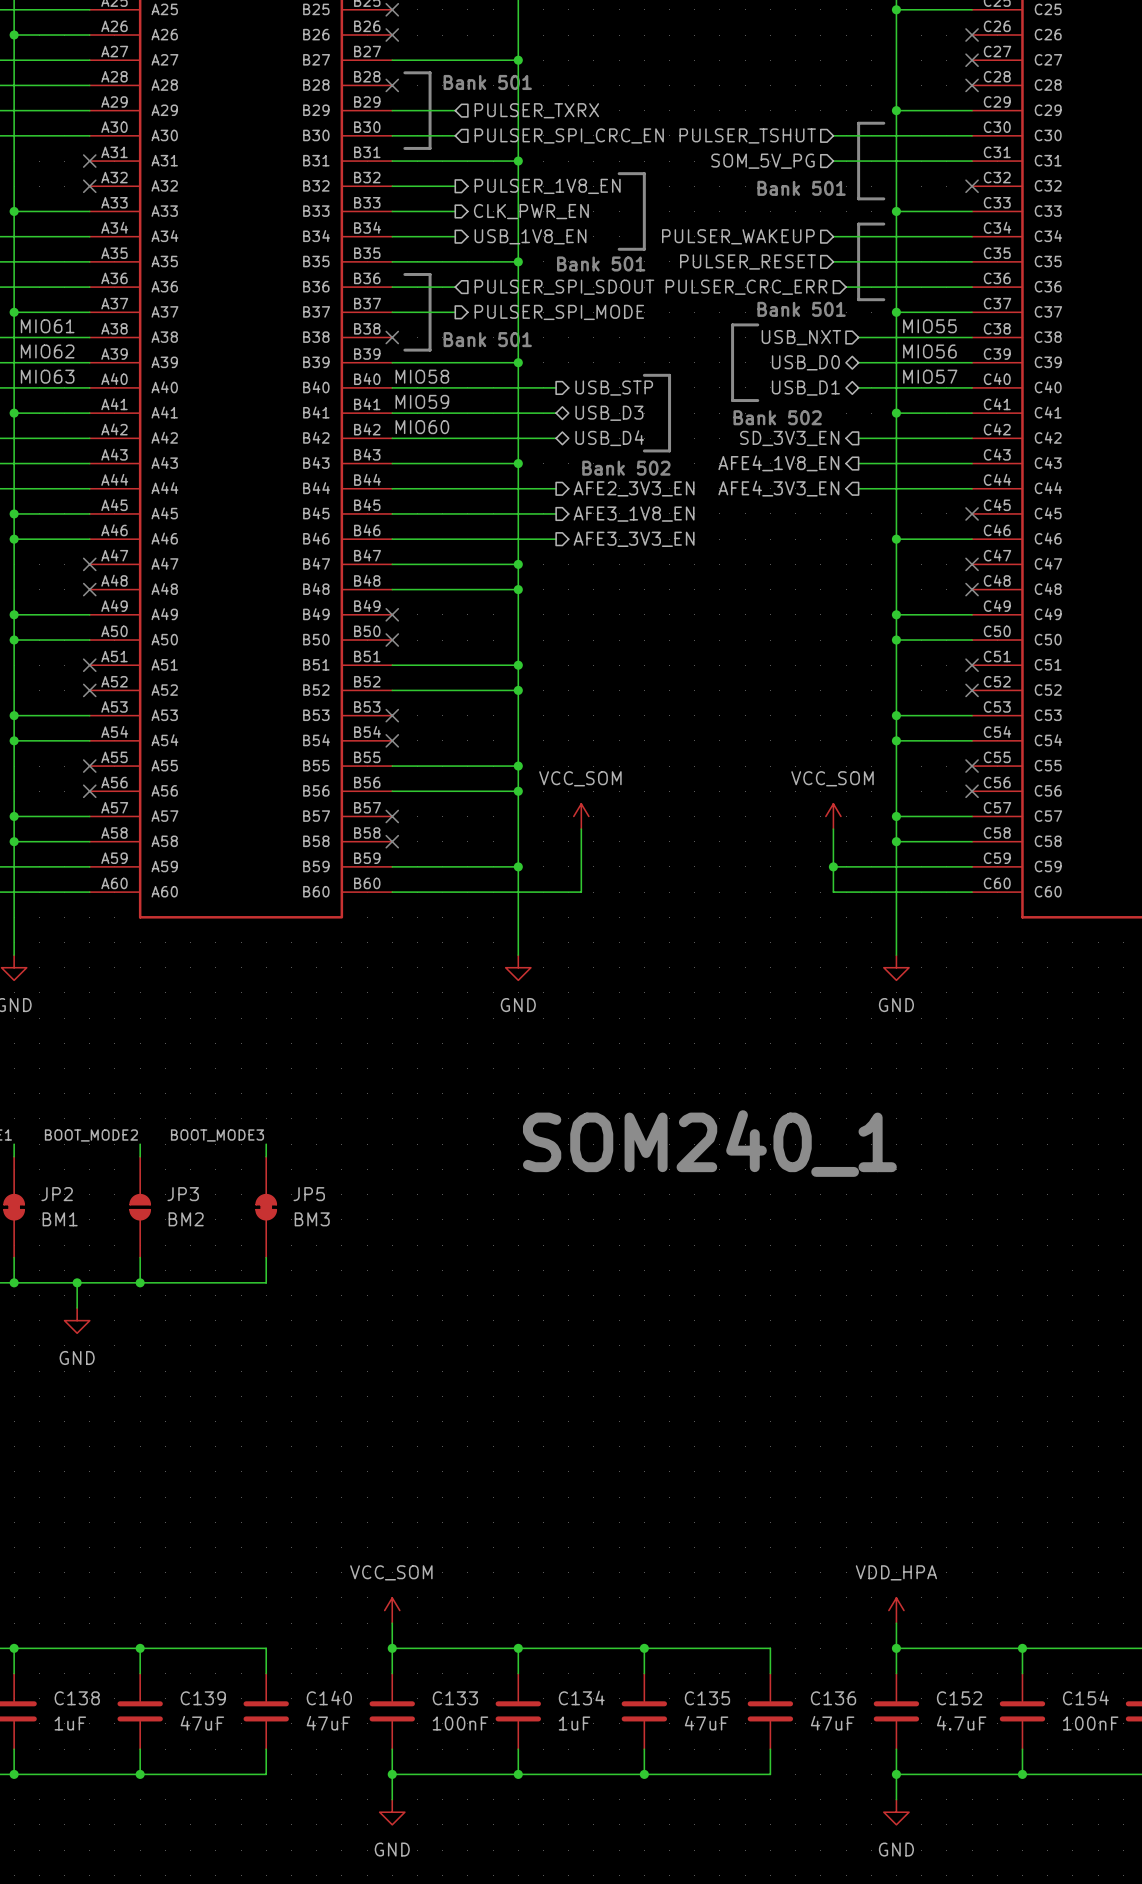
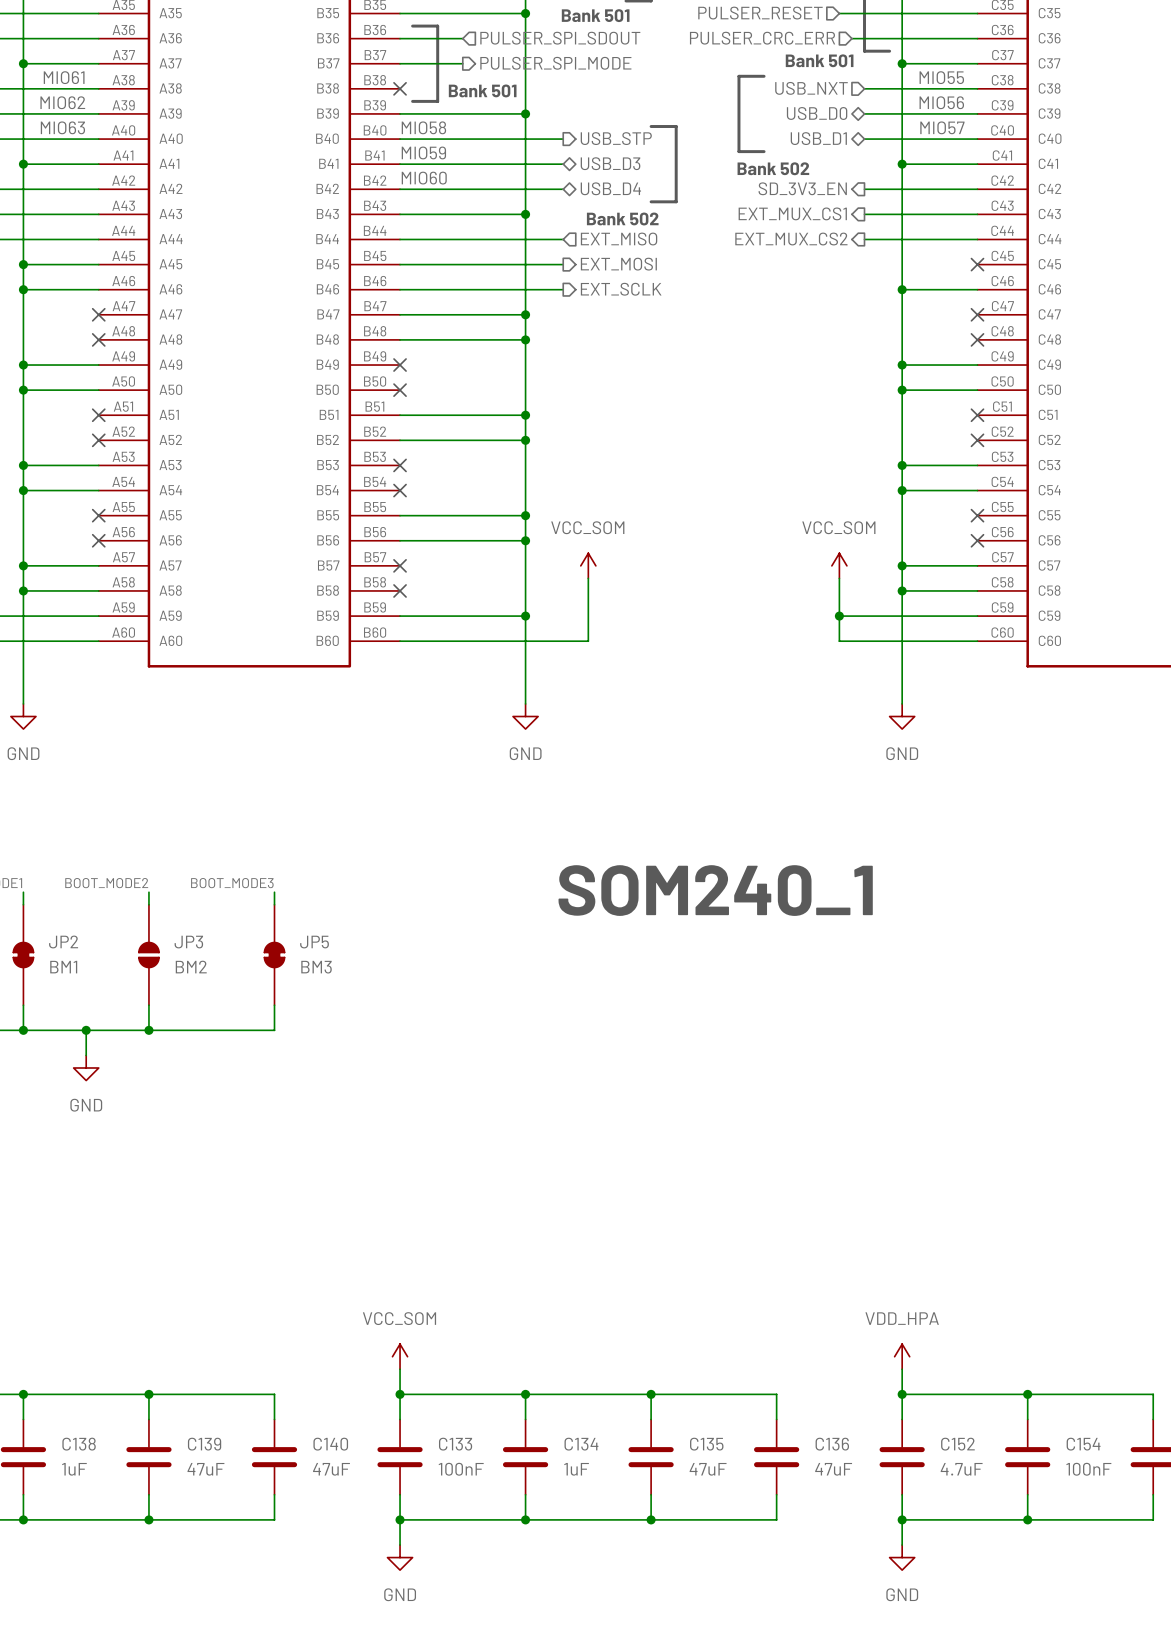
hierarchical label: AFE4_1V8_EN (778, 463) -> EXT_MUX_CS1 (792, 213)
hierarchical label shape: output (634, 488) -> input (619, 239)
hierarchical label: AFE2_3V3_EN (634, 488) -> EXT_MISO (619, 239)
hierarchical label: AFE4_3V3_EN (778, 488) -> EXT_MUX_CS2 (791, 239)
hierarchical label: AFE3_1V8_EN (634, 514) -> EXT_MOSI (618, 264)
hierarchical label: AFE3_3V3_EN (634, 539) -> EXT_SCLK (621, 289)

